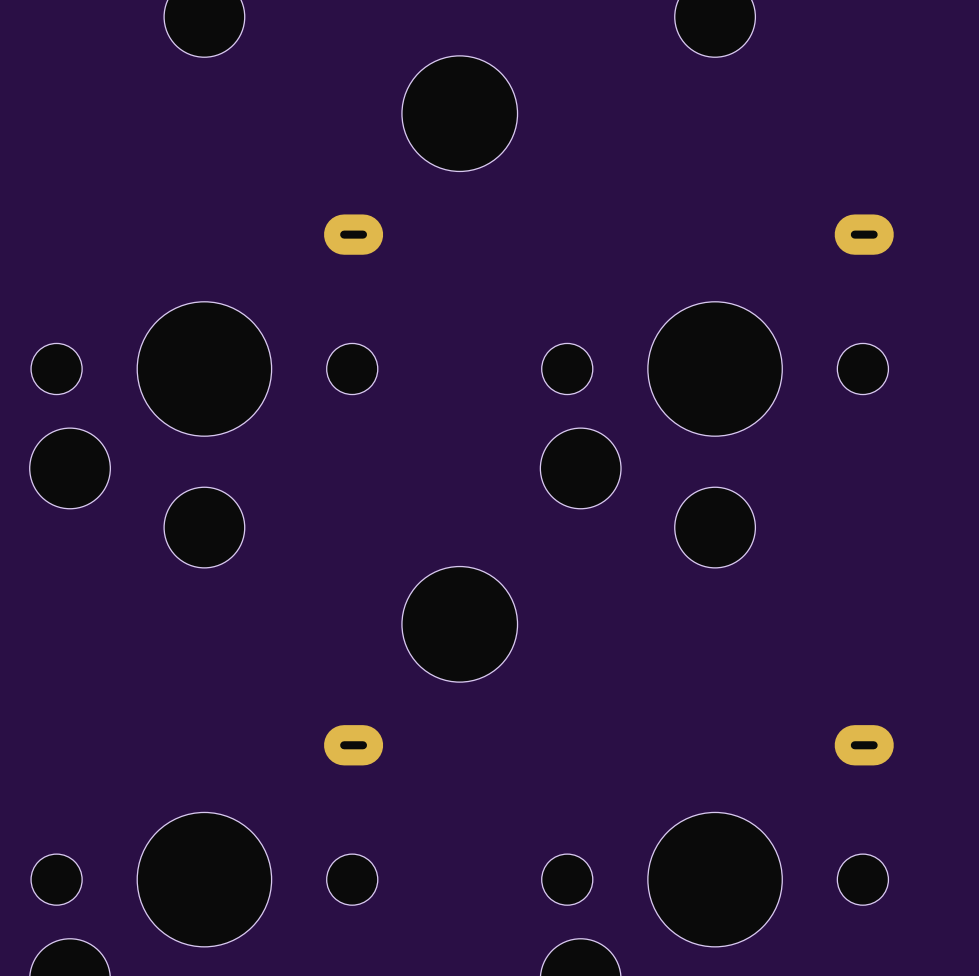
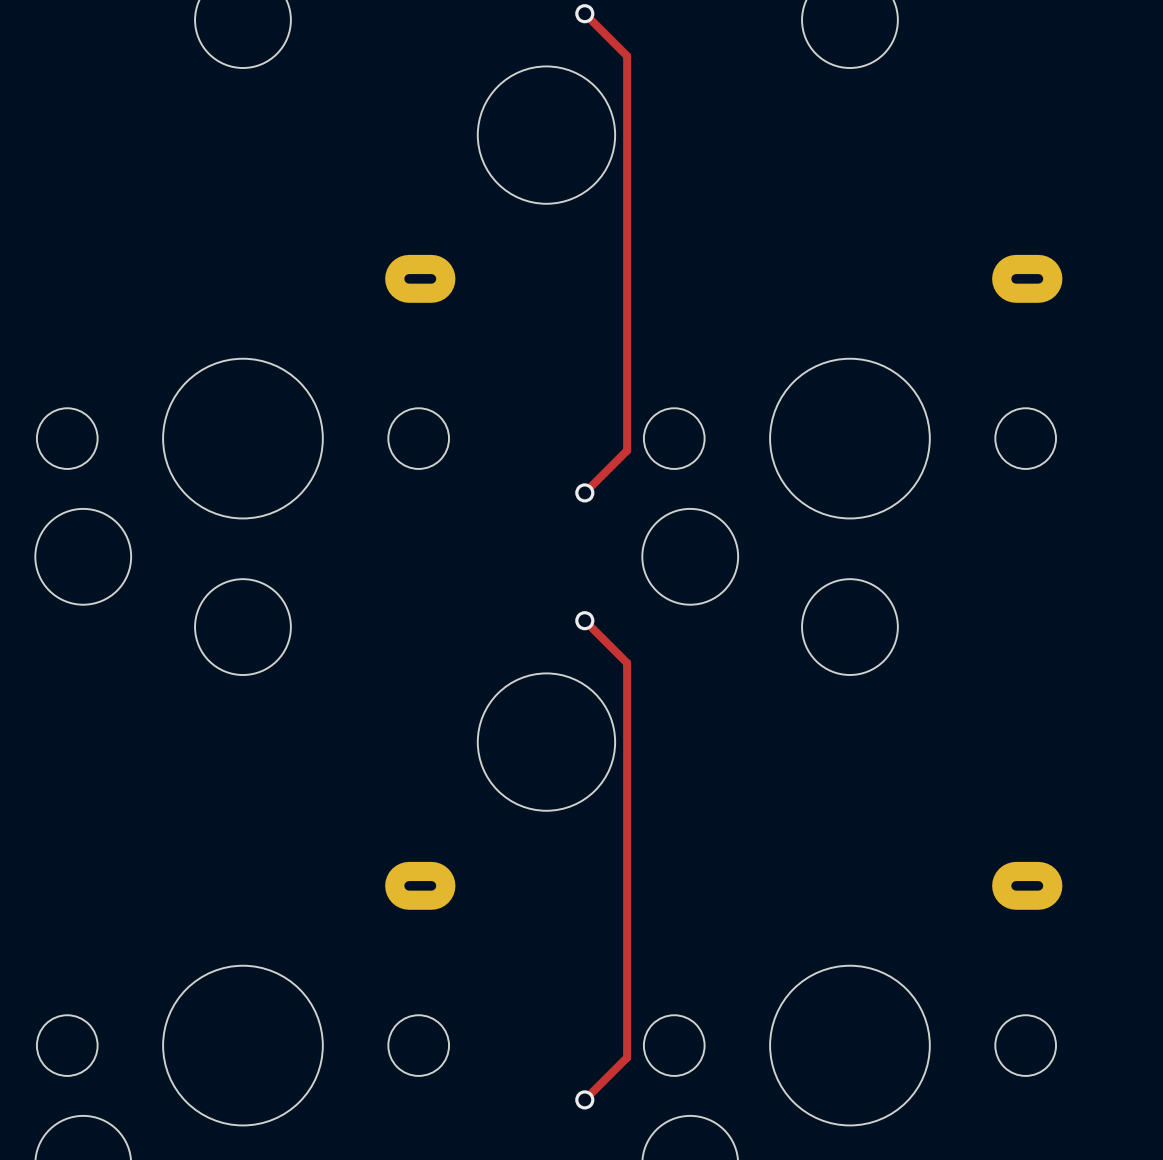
track: none -> (584, 13) (627, 56) (627, 450) (584, 492)
via: none -> (584, 13)
via: none -> (584, 492)
track: none -> (584, 620) (627, 663) (627, 1057) (584, 1099)
via: none -> (584, 620)
via: none -> (584, 1099)

